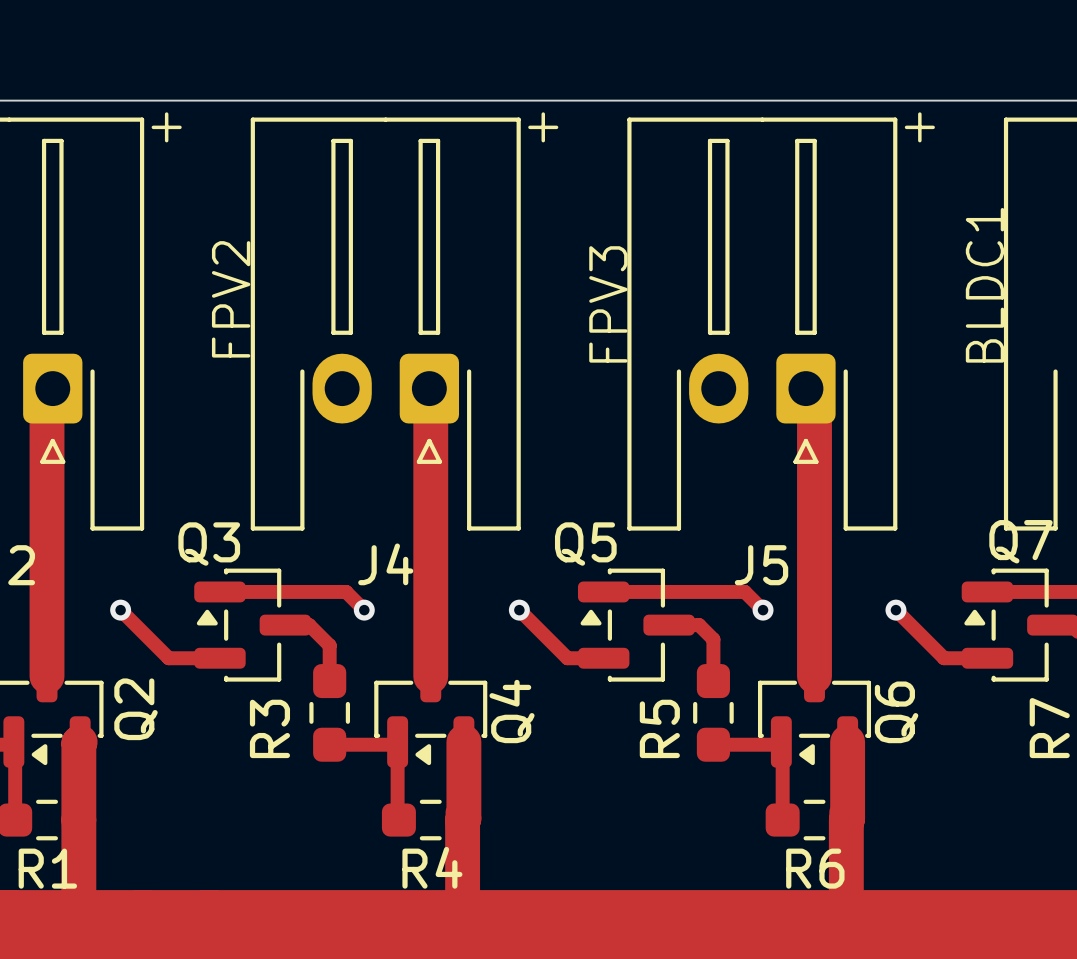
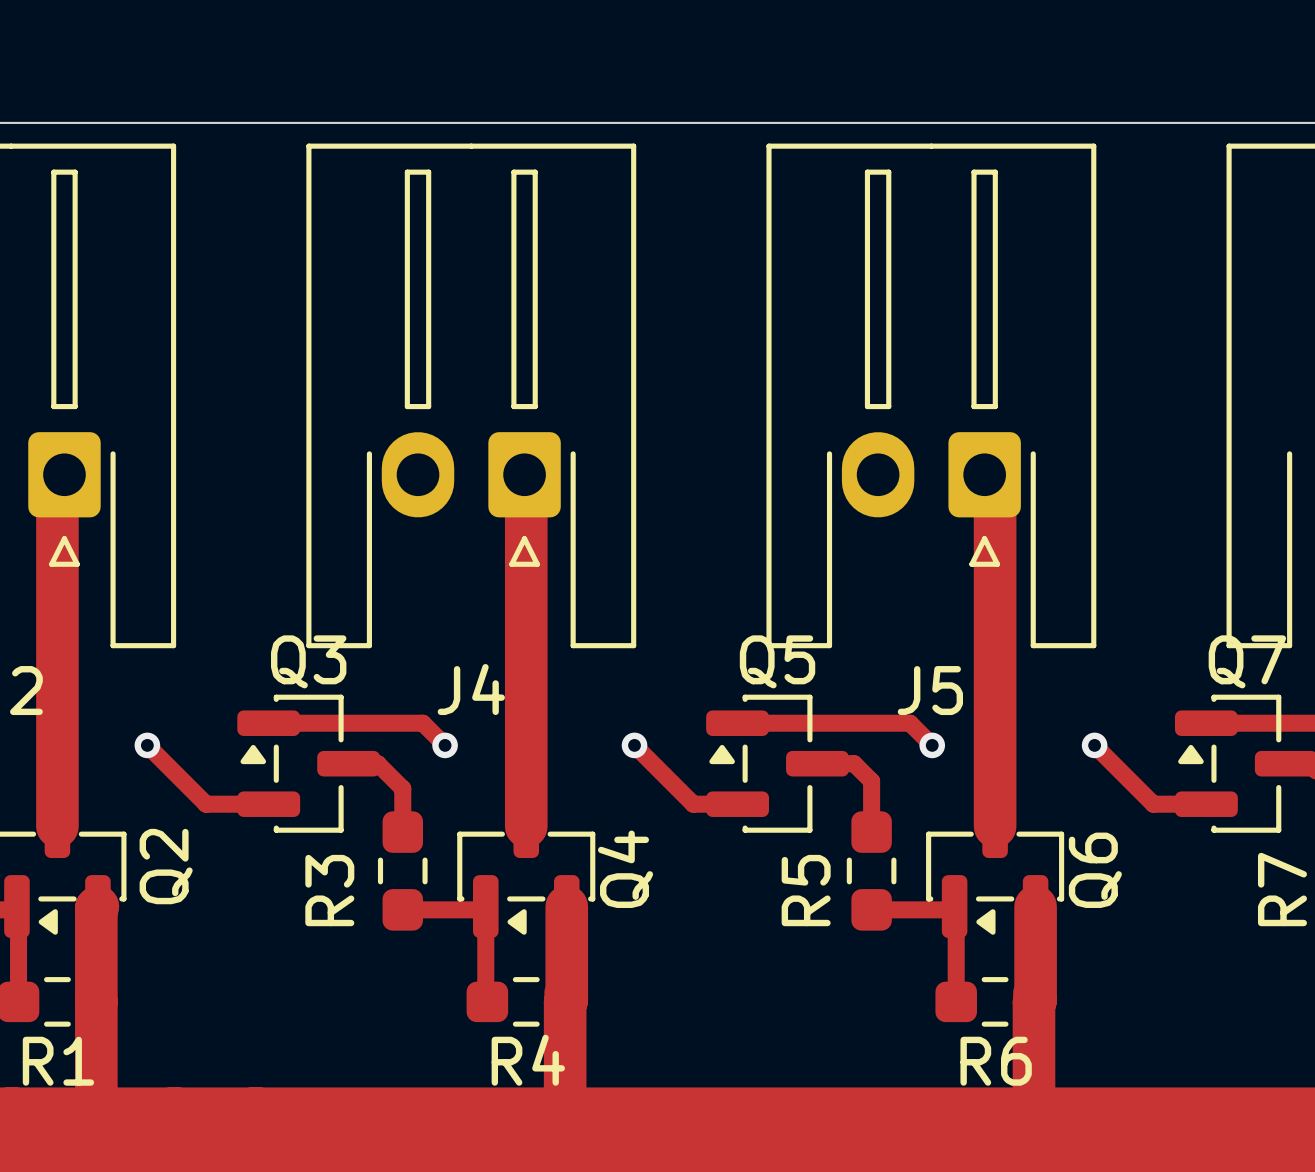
text: + (166, 127) -> none
text: + (543, 127) -> none
text: + (919, 127) -> none
text: BLDC1 (985, 285) -> none
text: FPV2 (231, 299) -> none
text: FPV3 (608, 304) -> none
Q3 name position: Q3 (209, 544) -> Q3 (308, 661)
Q5 name position: Q5 (585, 544) -> Q5 (777, 661)

